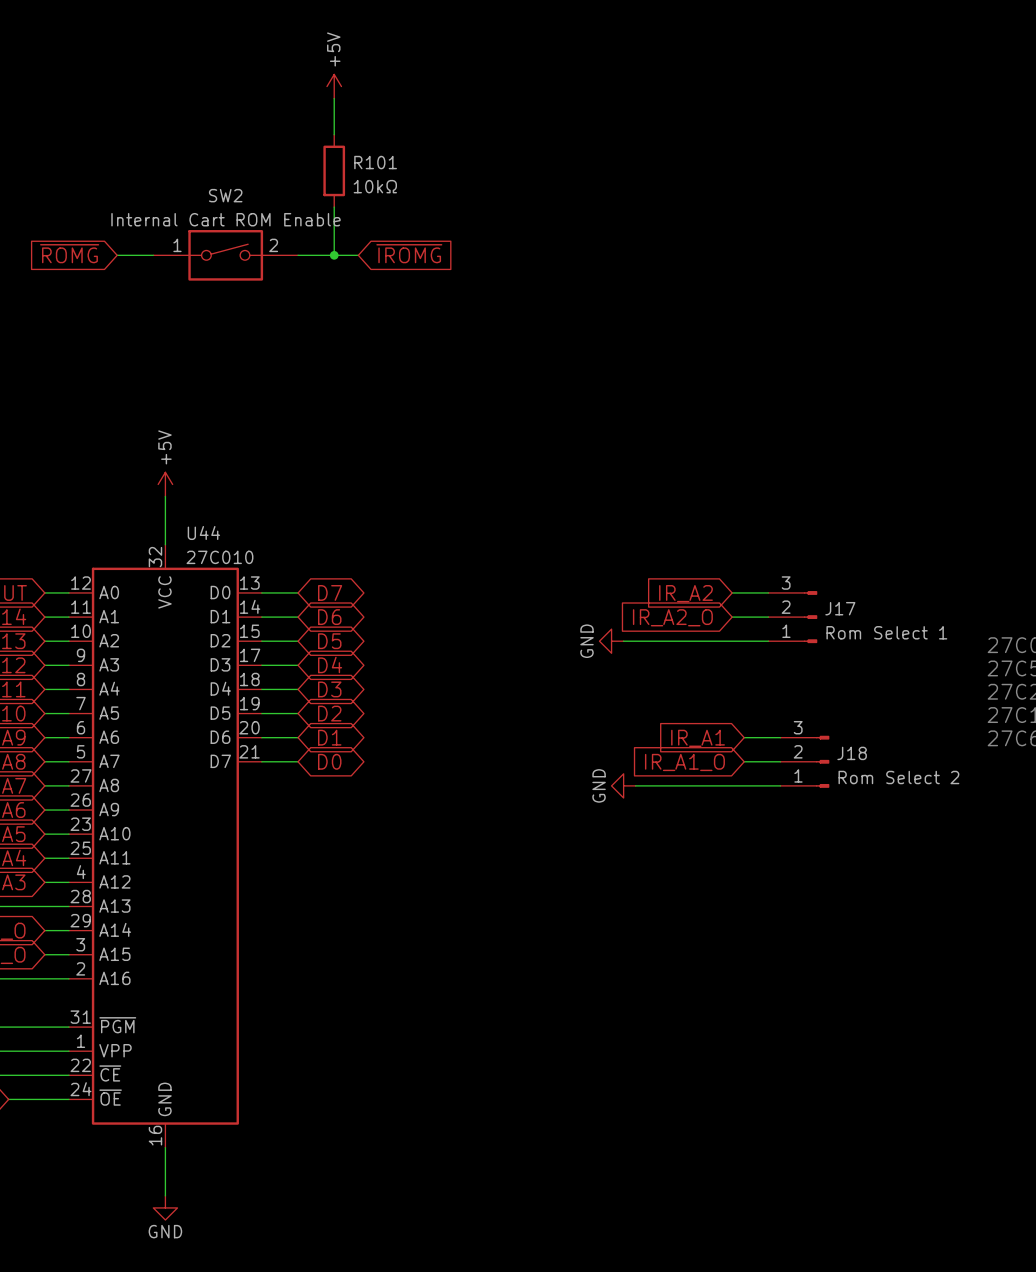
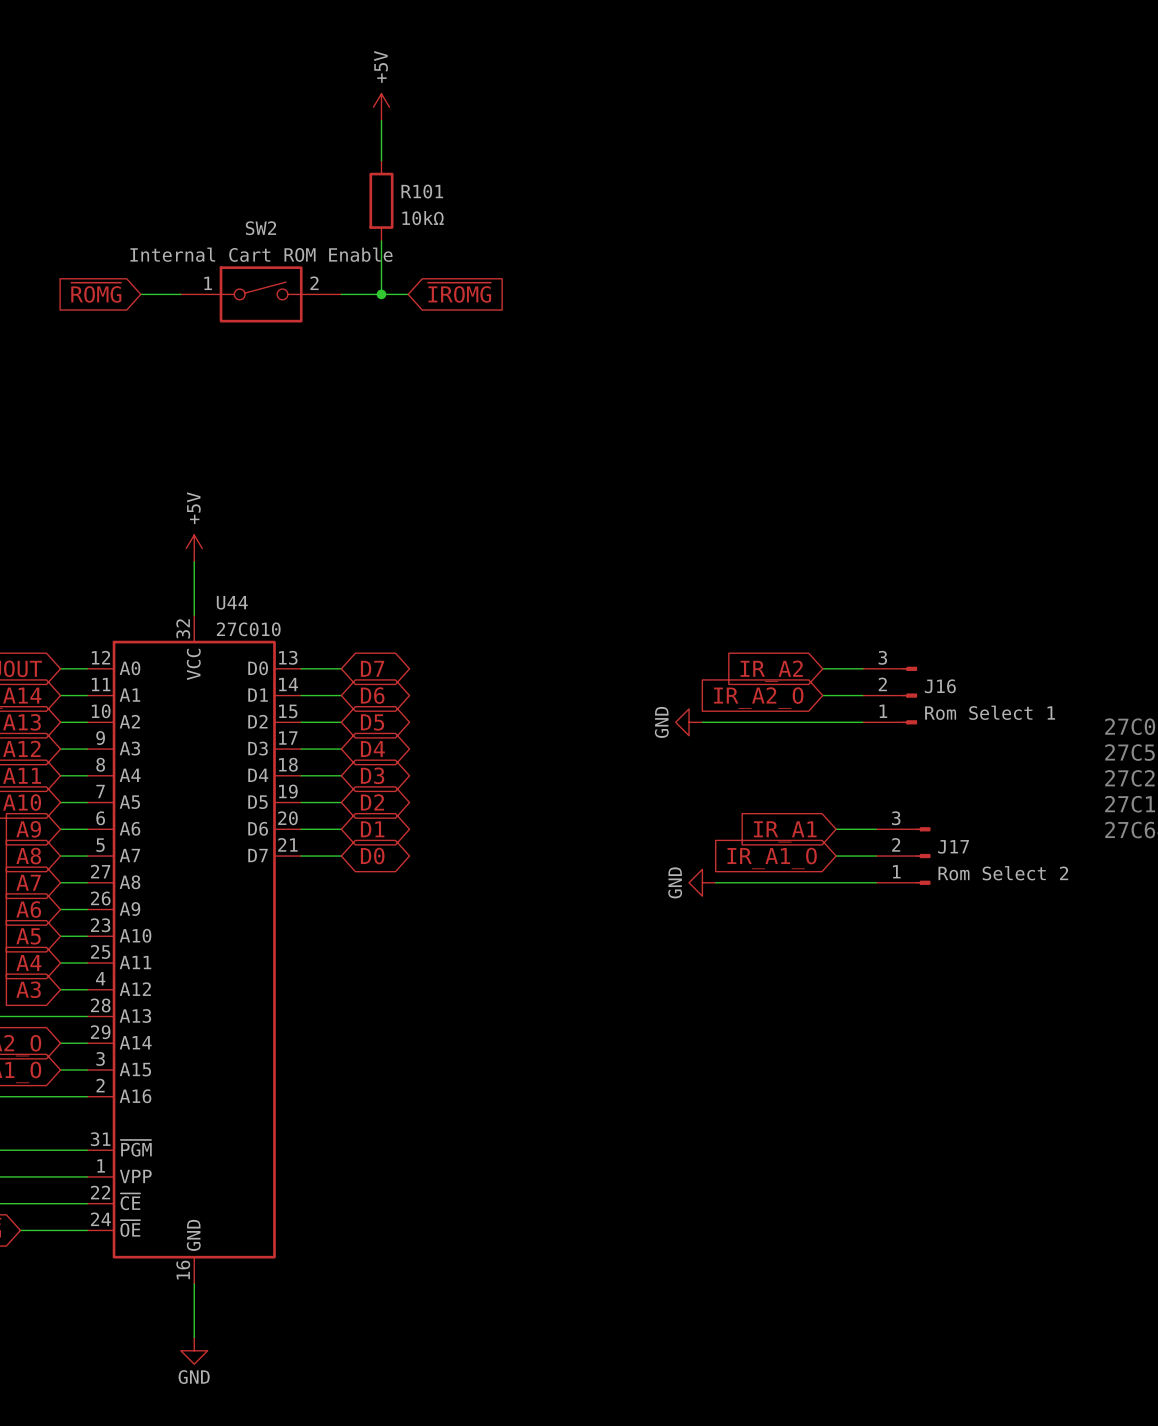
J17 name: J17 (840, 608) -> J16 (940, 686)
J18 name: J18 (852, 753) -> J17 (953, 846)

